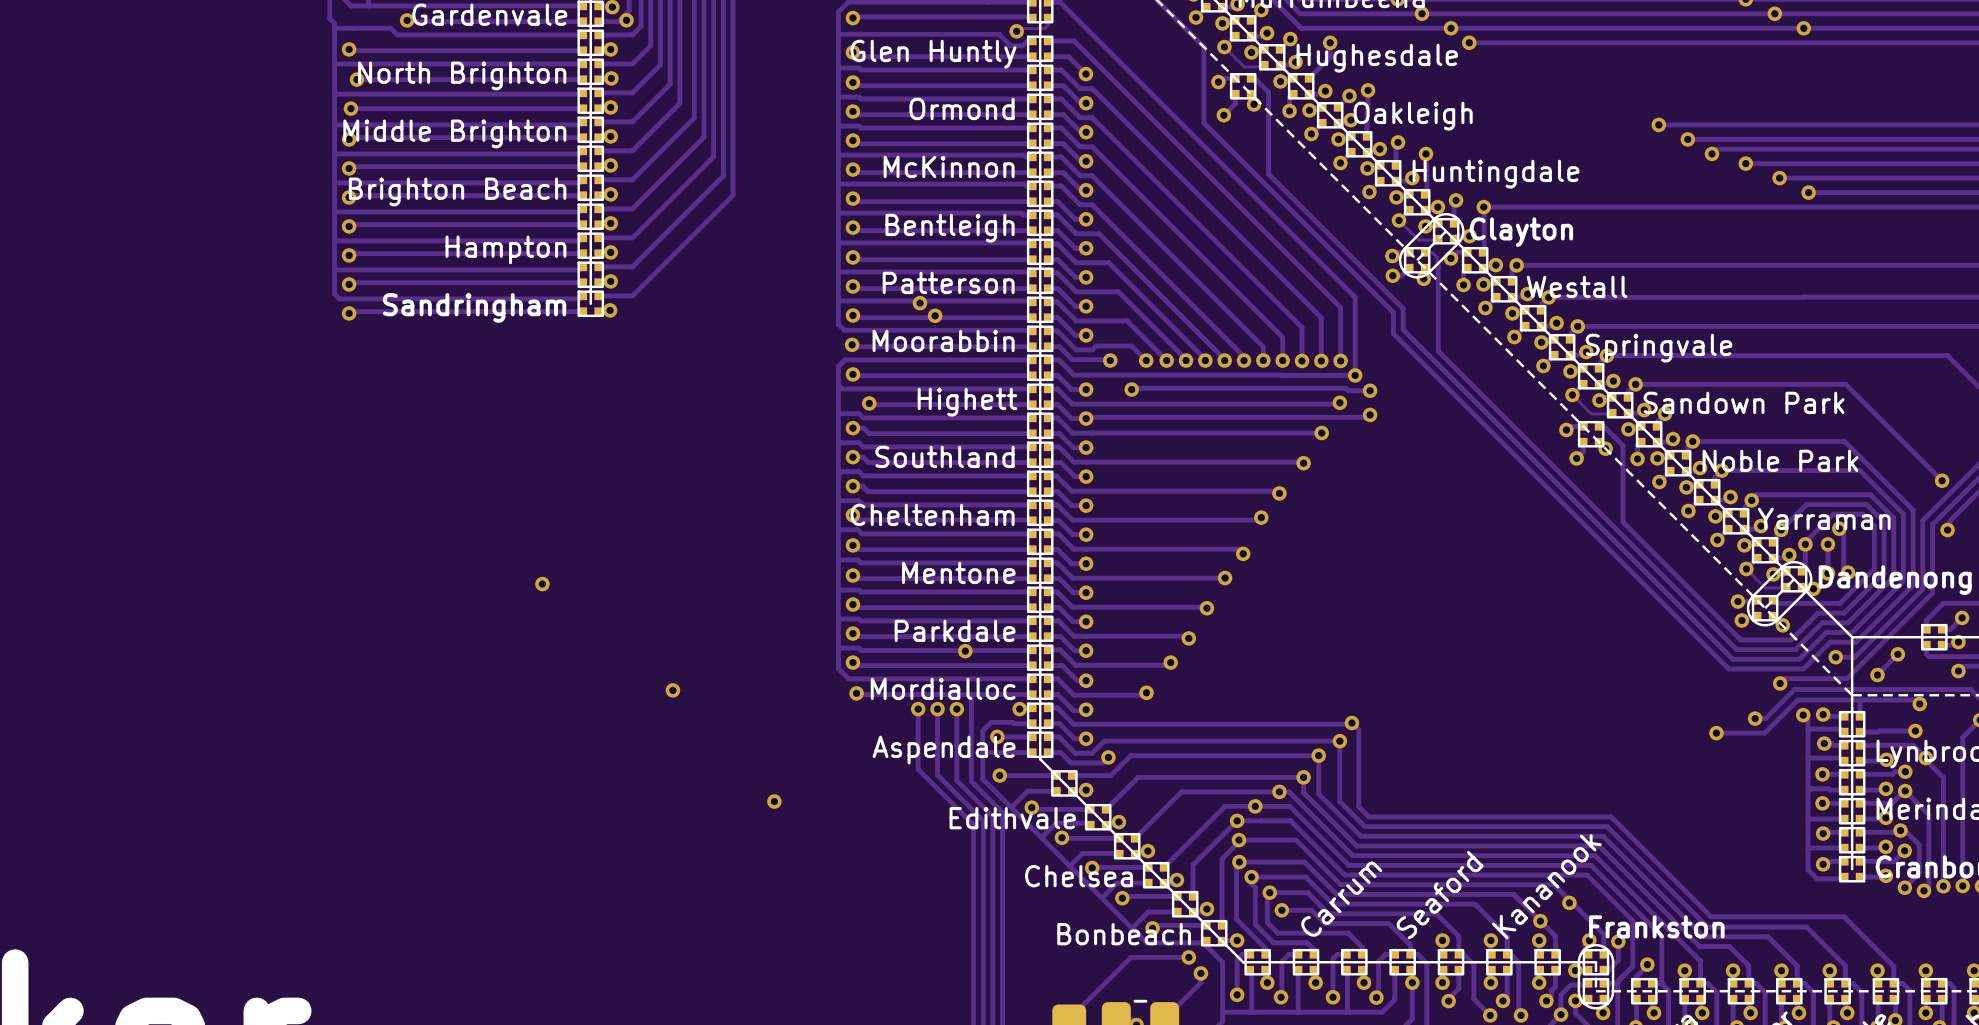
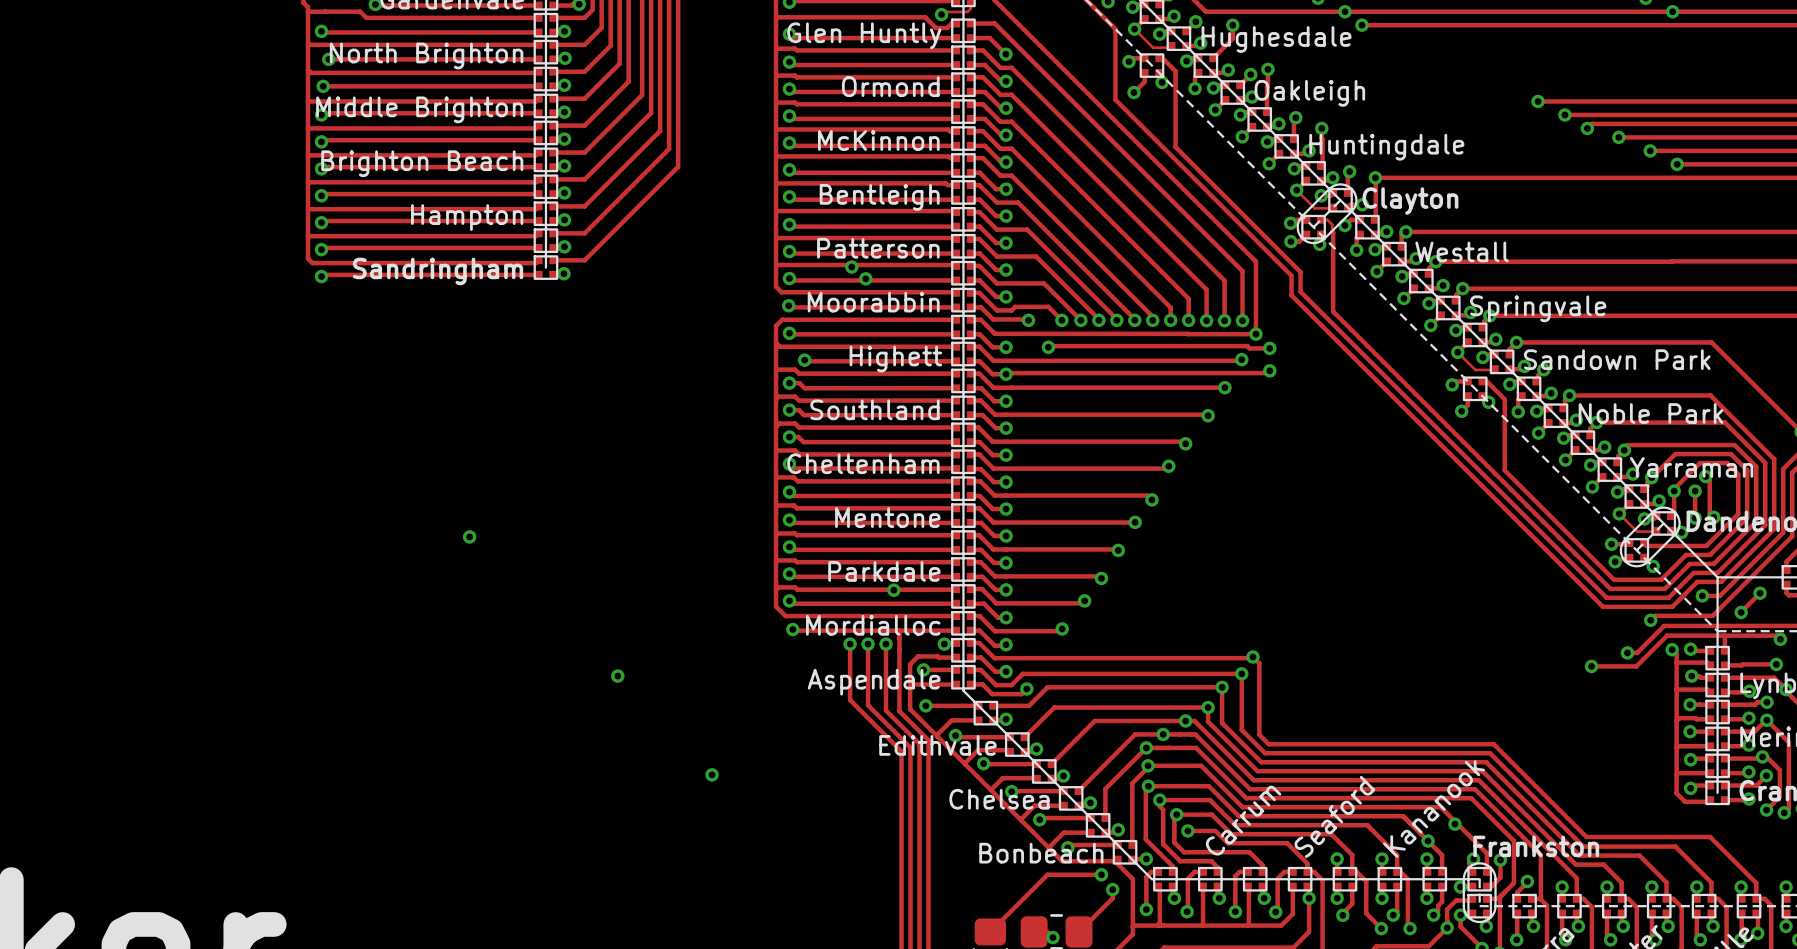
via position: (542, 584) -> (469, 536)
via position: (672, 690) -> (617, 676)
via position: (774, 801) -> (712, 774)

